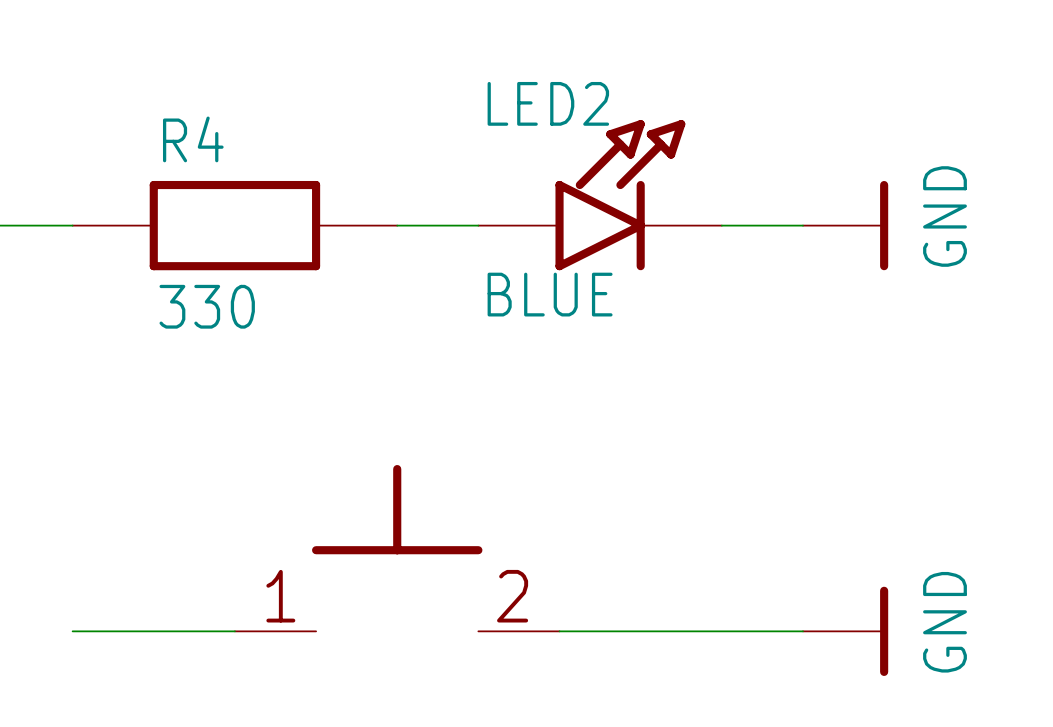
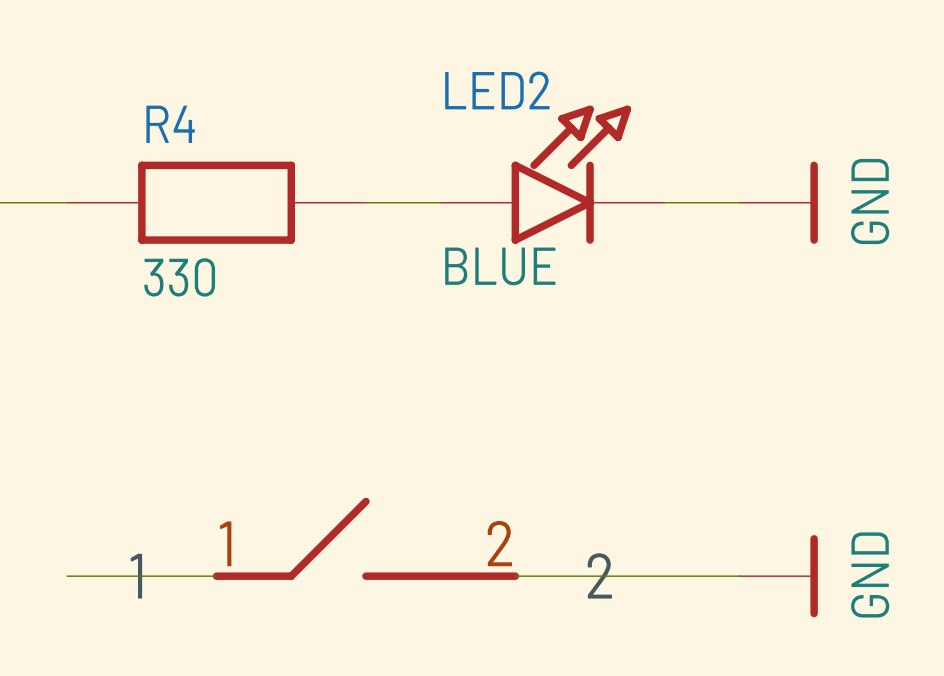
part: (397, 548) -> none
part: none -> (365, 538)

